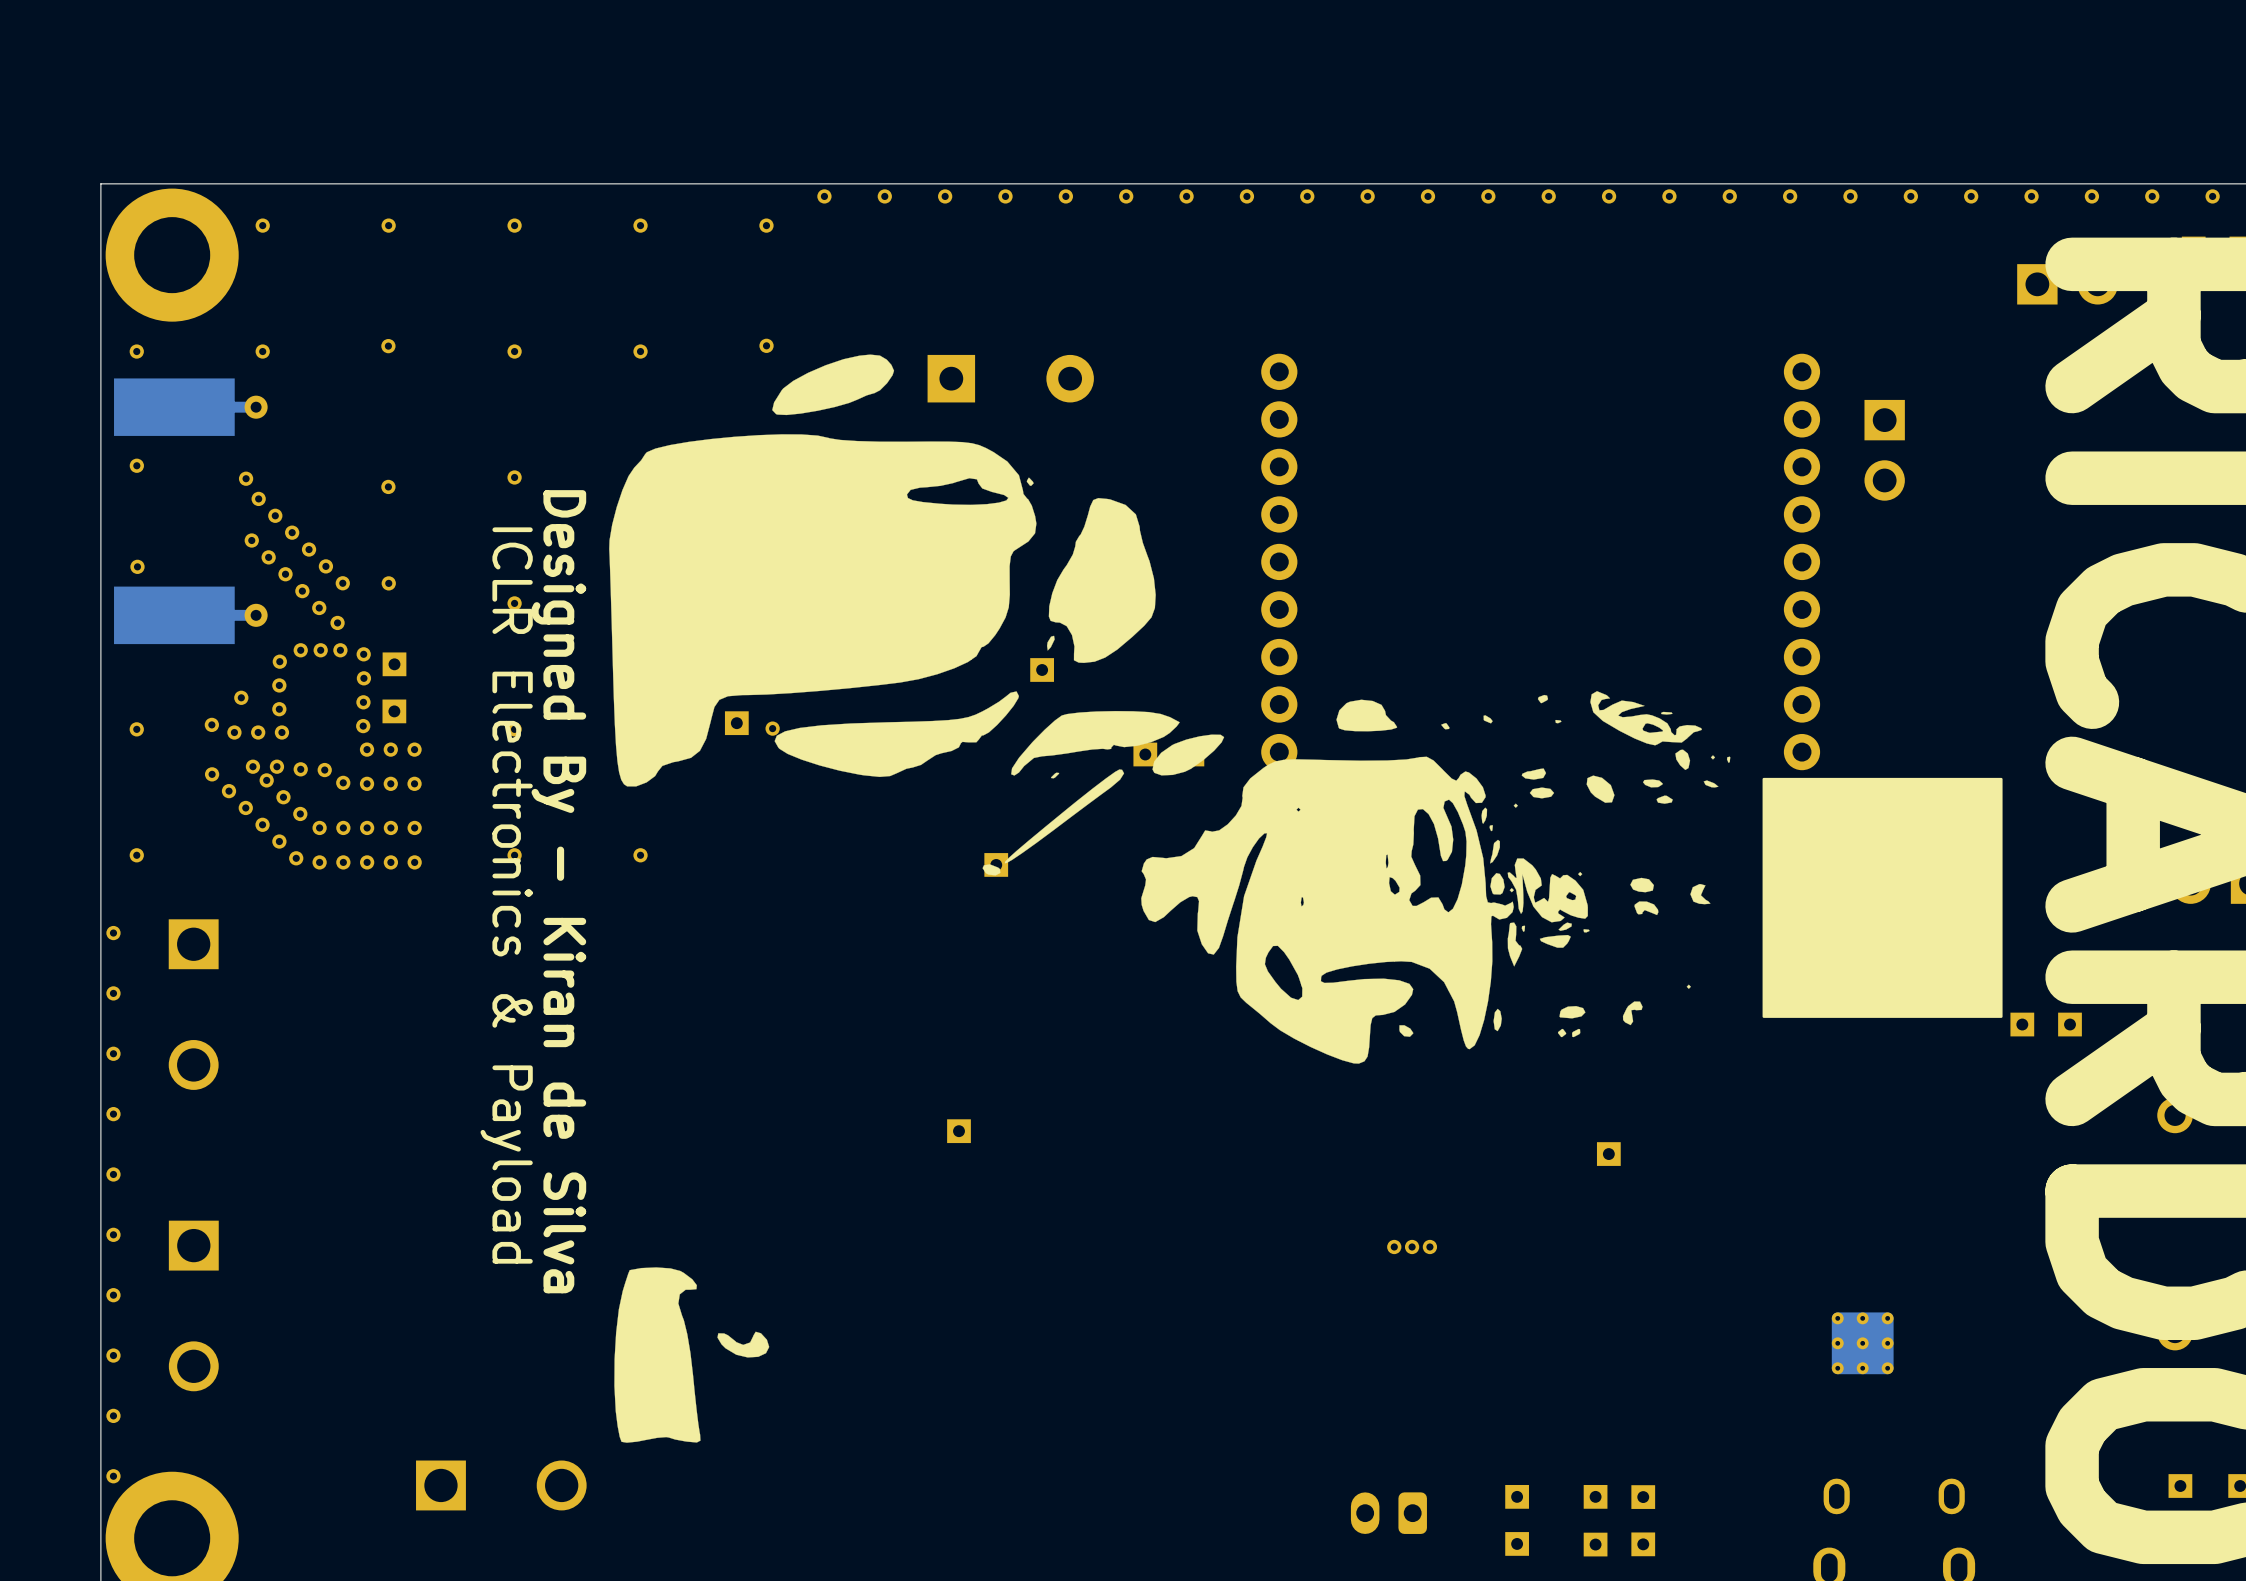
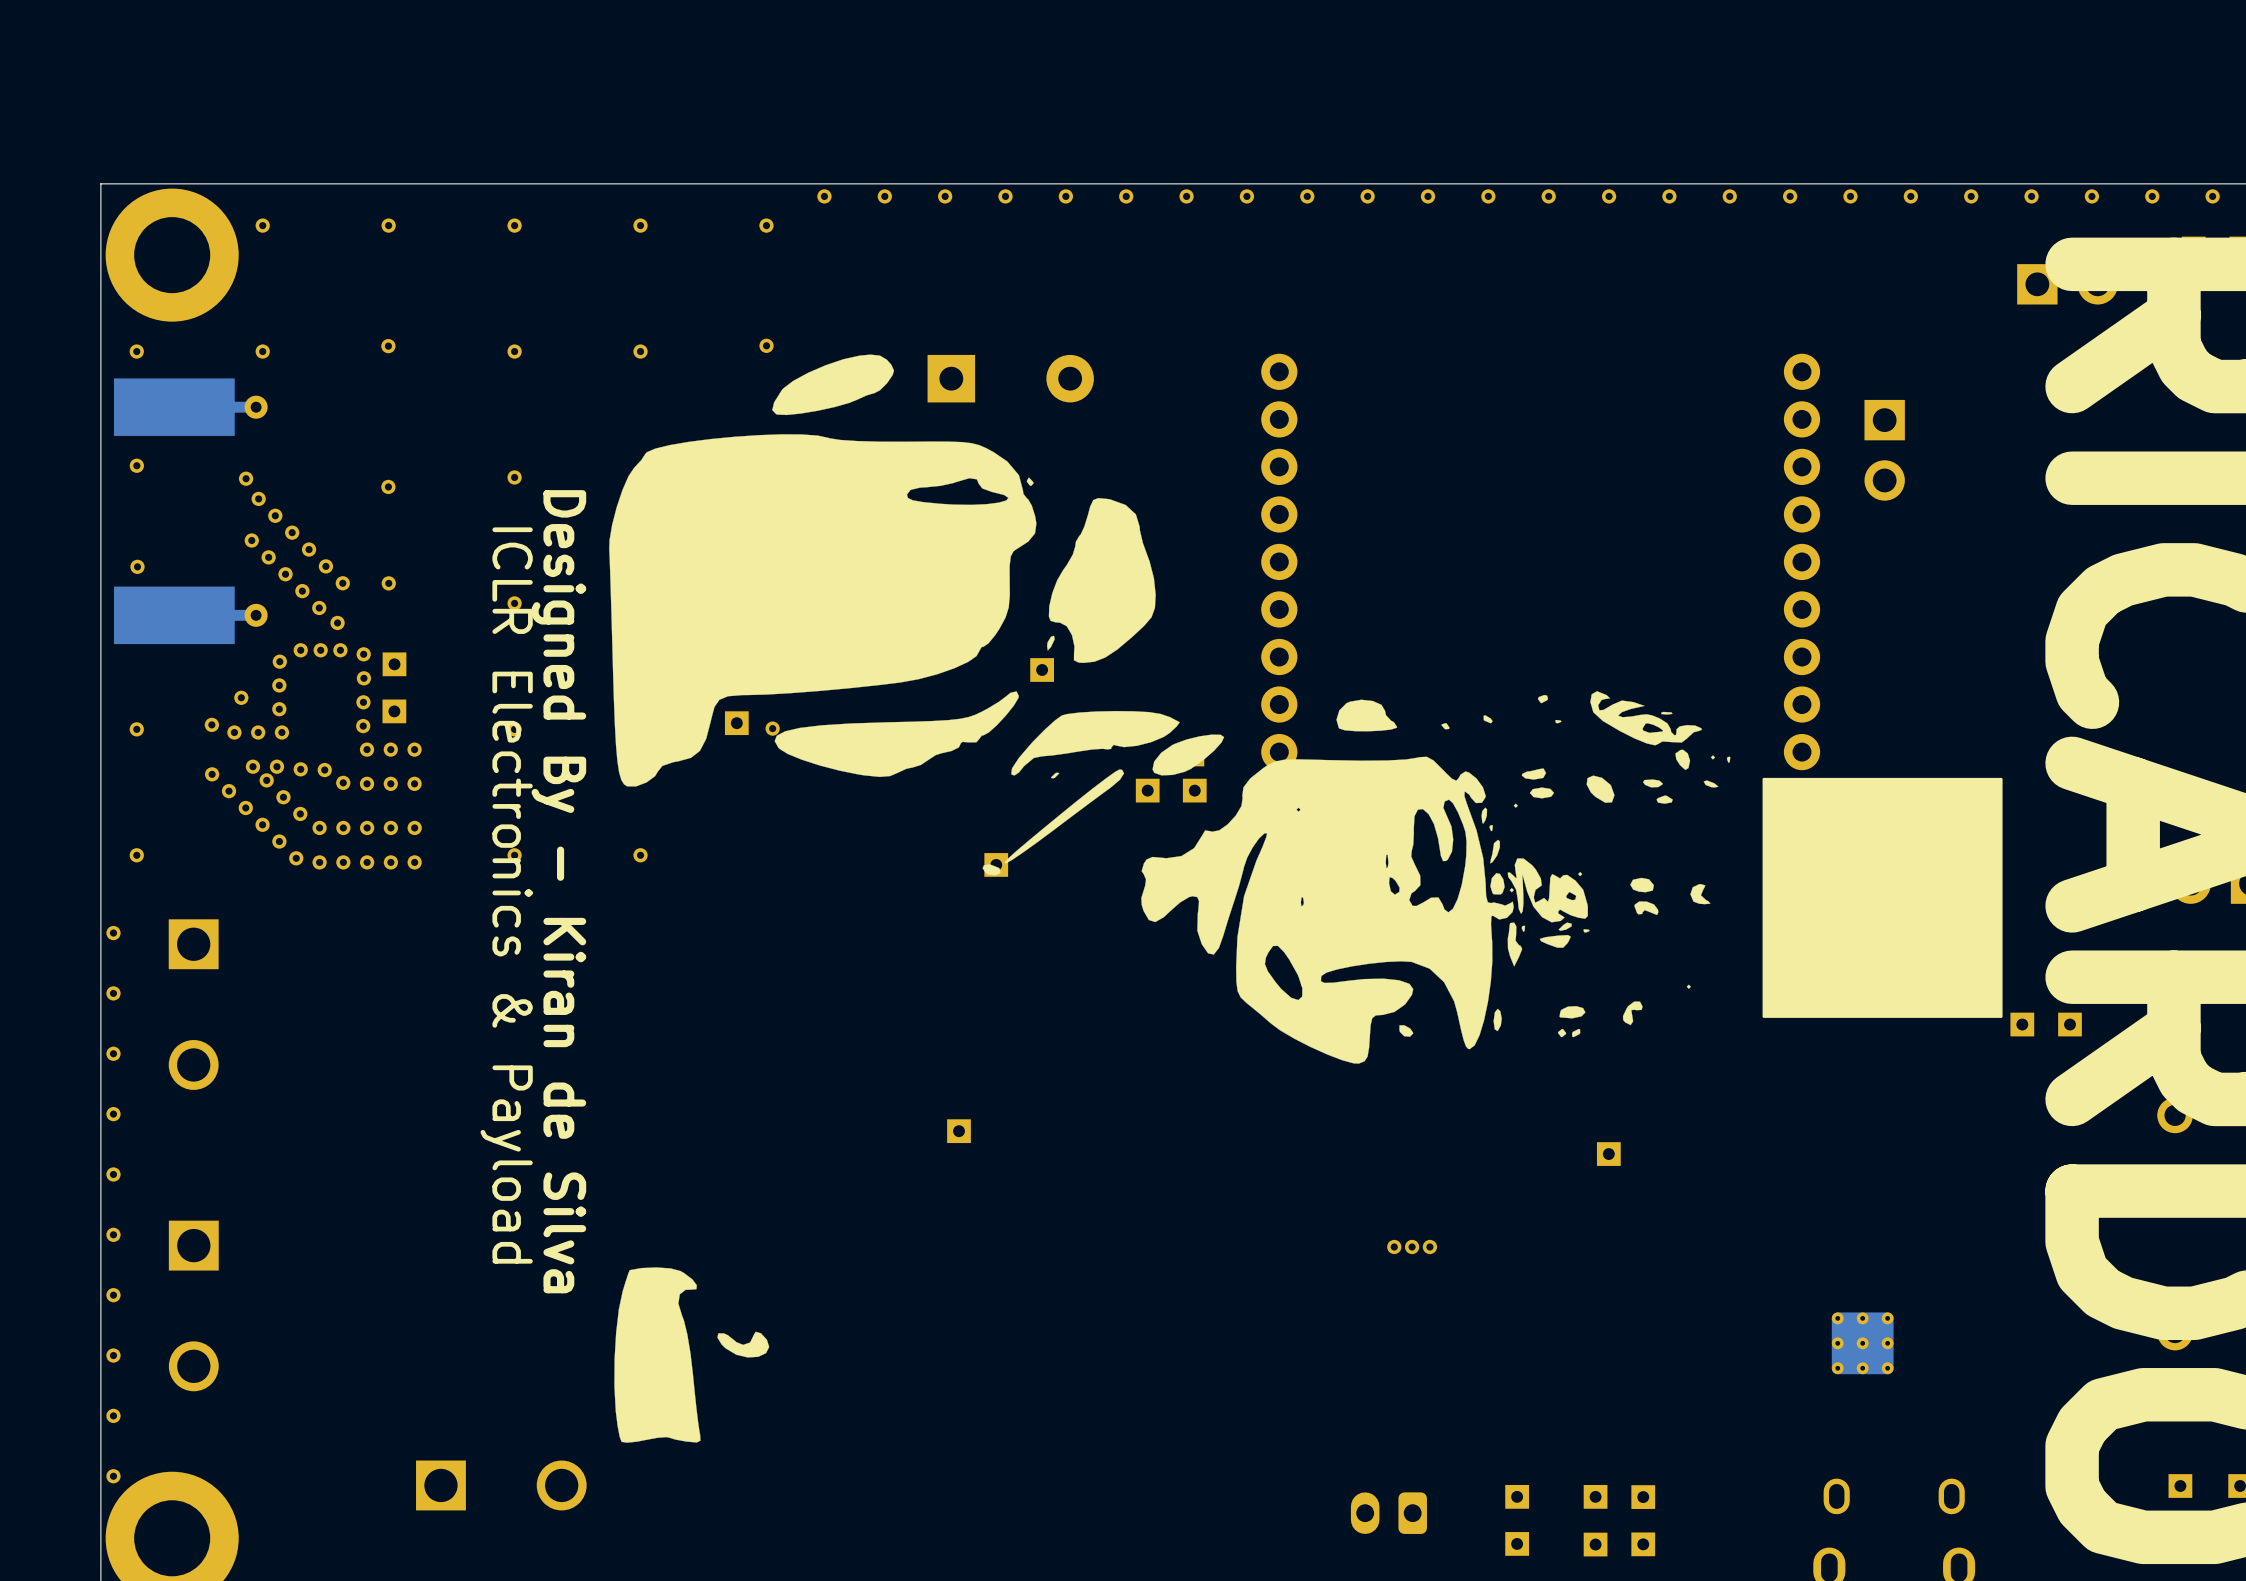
part: (1145, 754) -> none
part: none -> (1147, 790)
part: none -> (1194, 790)

